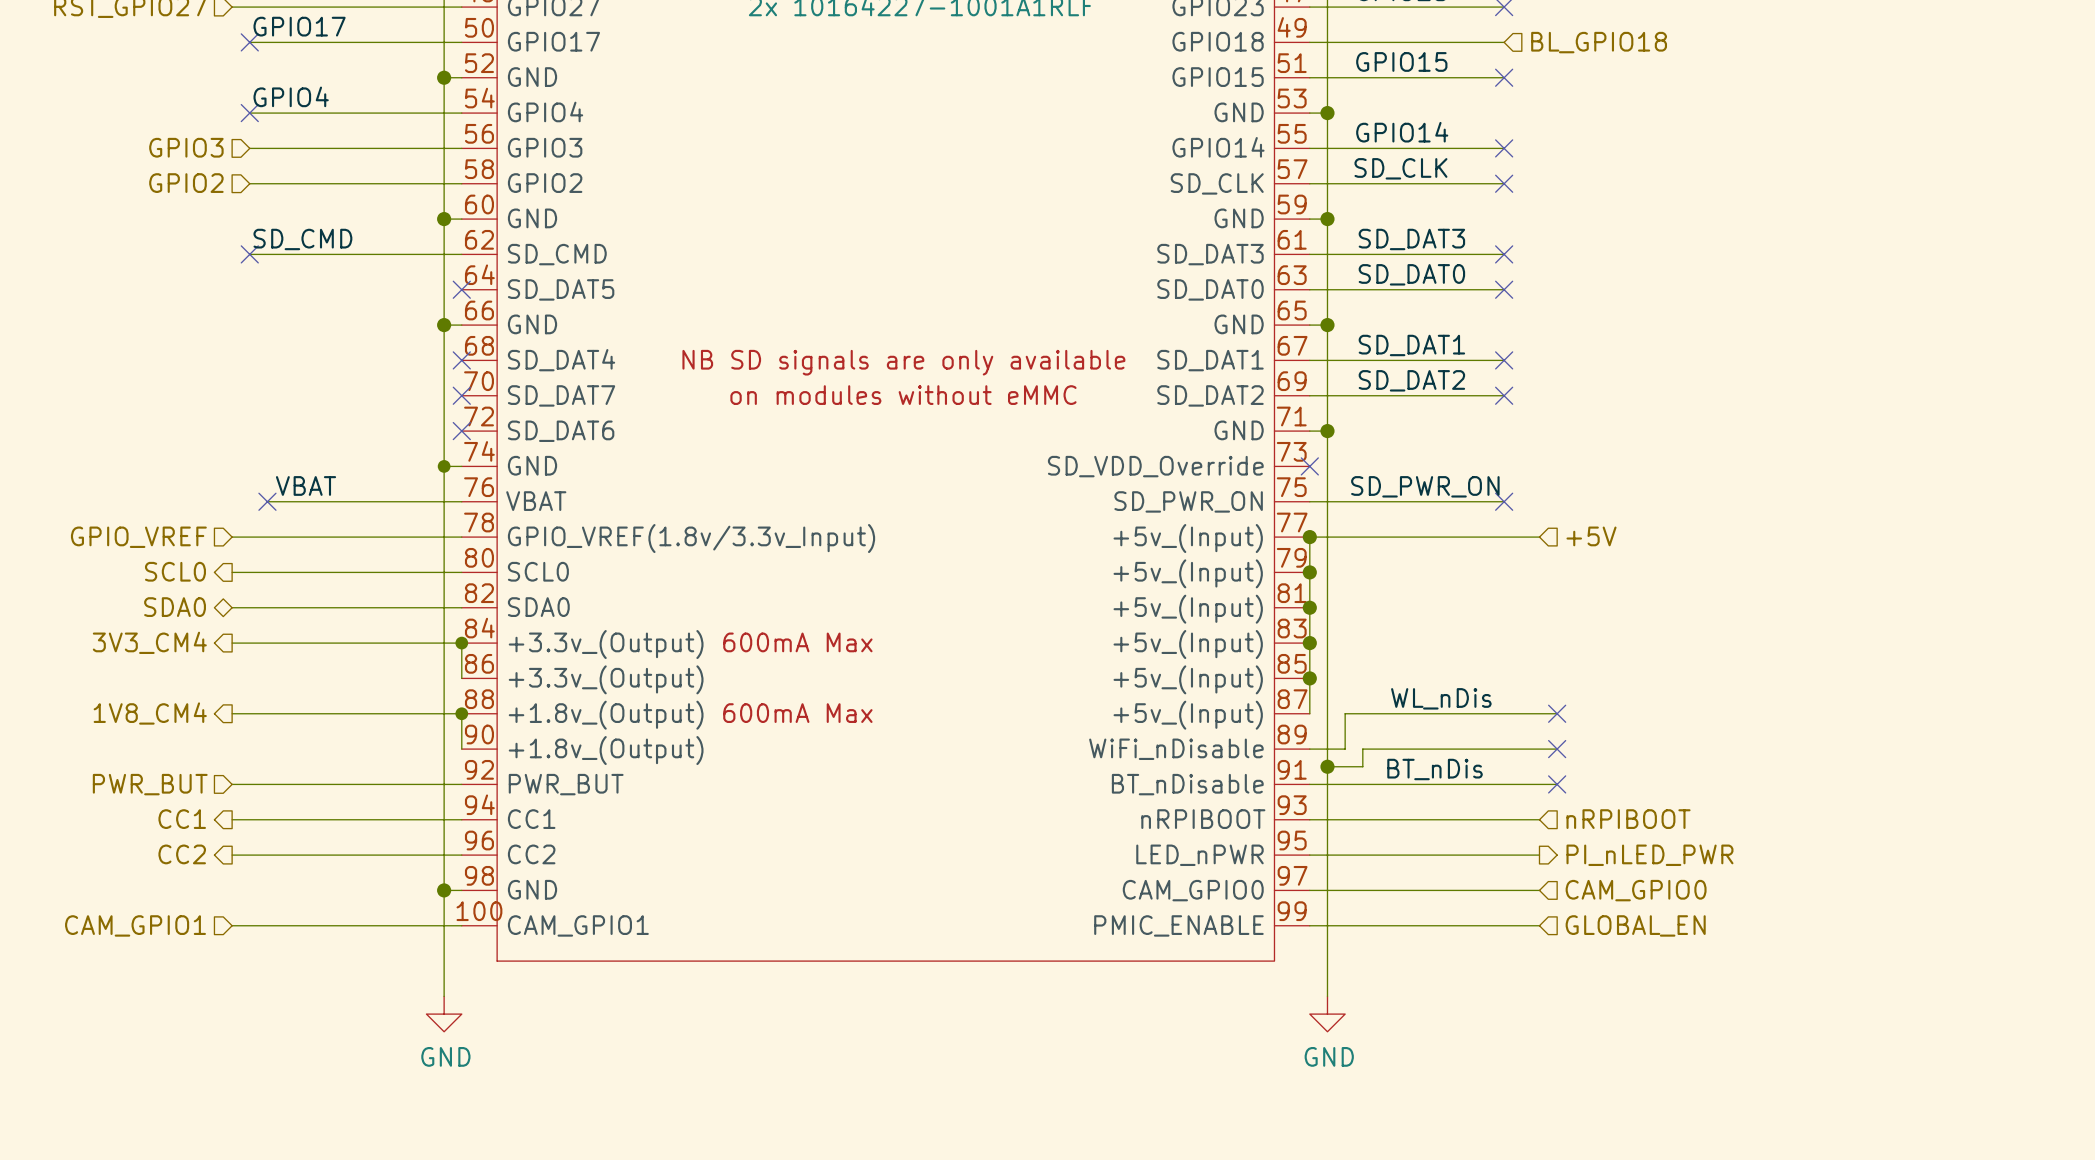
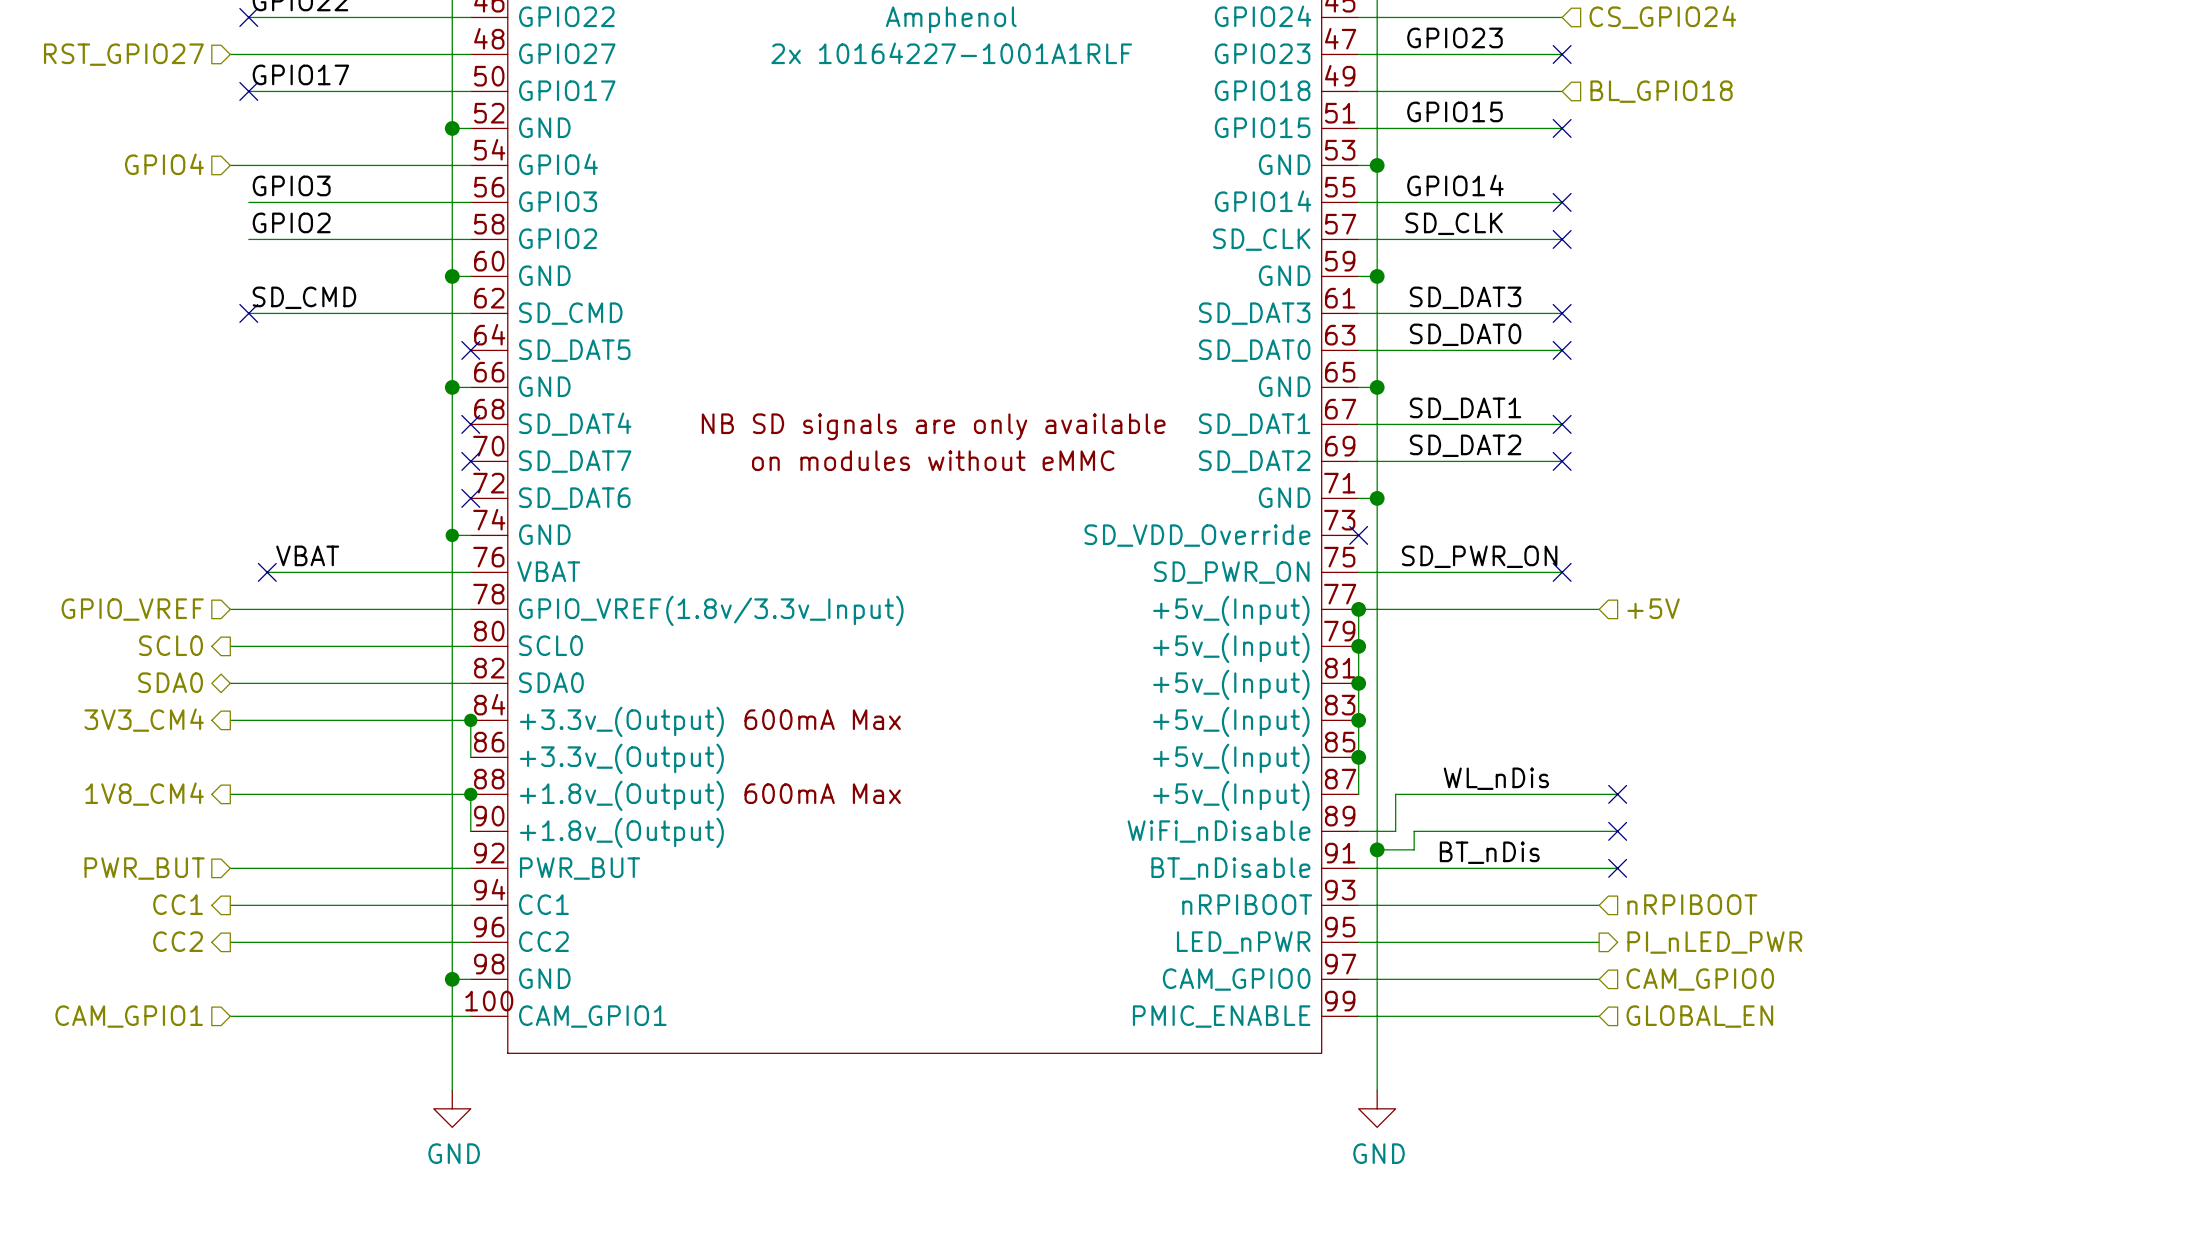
label: GPIO4 (291, 96) -> GPIO3 (291, 185)
wire: none -> (230, 165) (248, 165)
no-connect mark: (249, 113) -> none
hierarchical label: GPIO3 (186, 147) -> GPIO4 (164, 164)
label: none -> GPIO2 (291, 222)
hierarchical label: GPIO2 (186, 183) -> none

